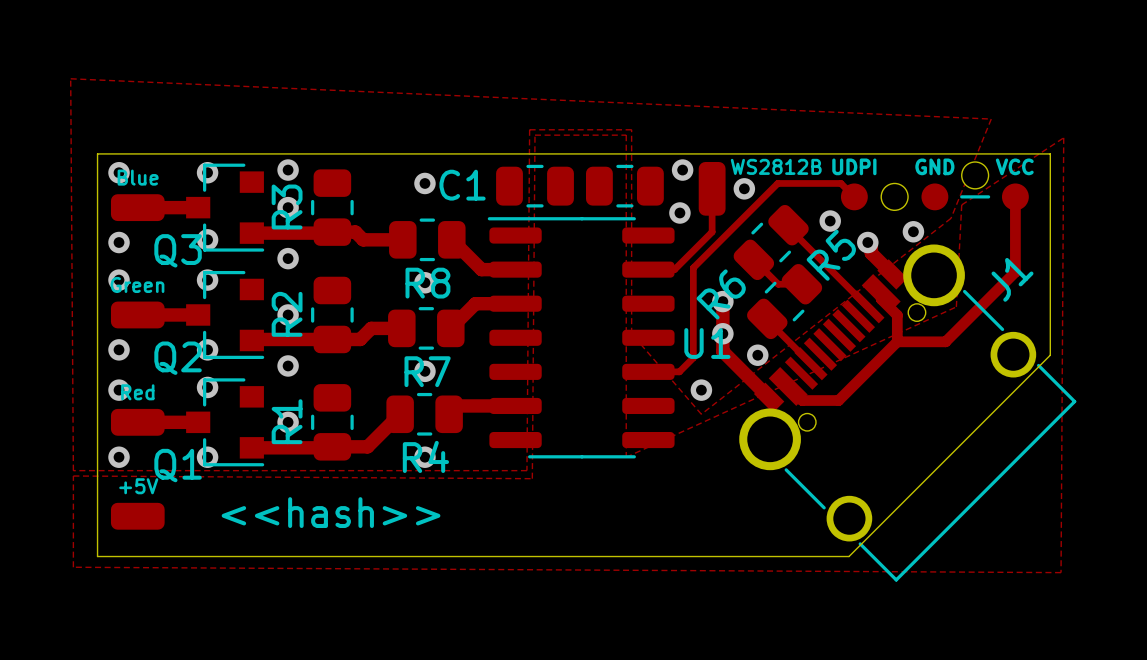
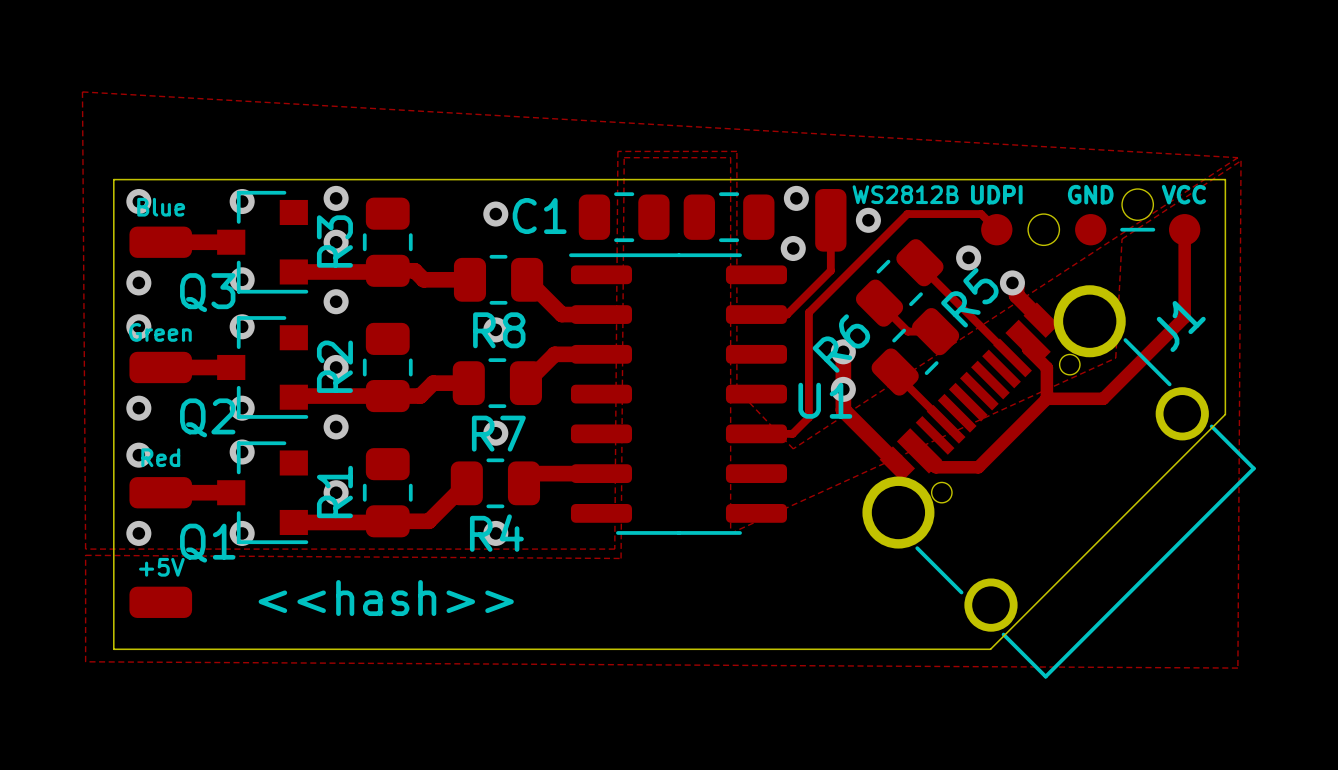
zone outline: (70, 78) (991, 119) (951, 218) (701, 414) (631, 333) -> (82, 91) (1237, 157) (793, 448) (736, 389)
via: (913, 231) -> none
via: (757, 355) -> none
via: (701, 390) -> none

